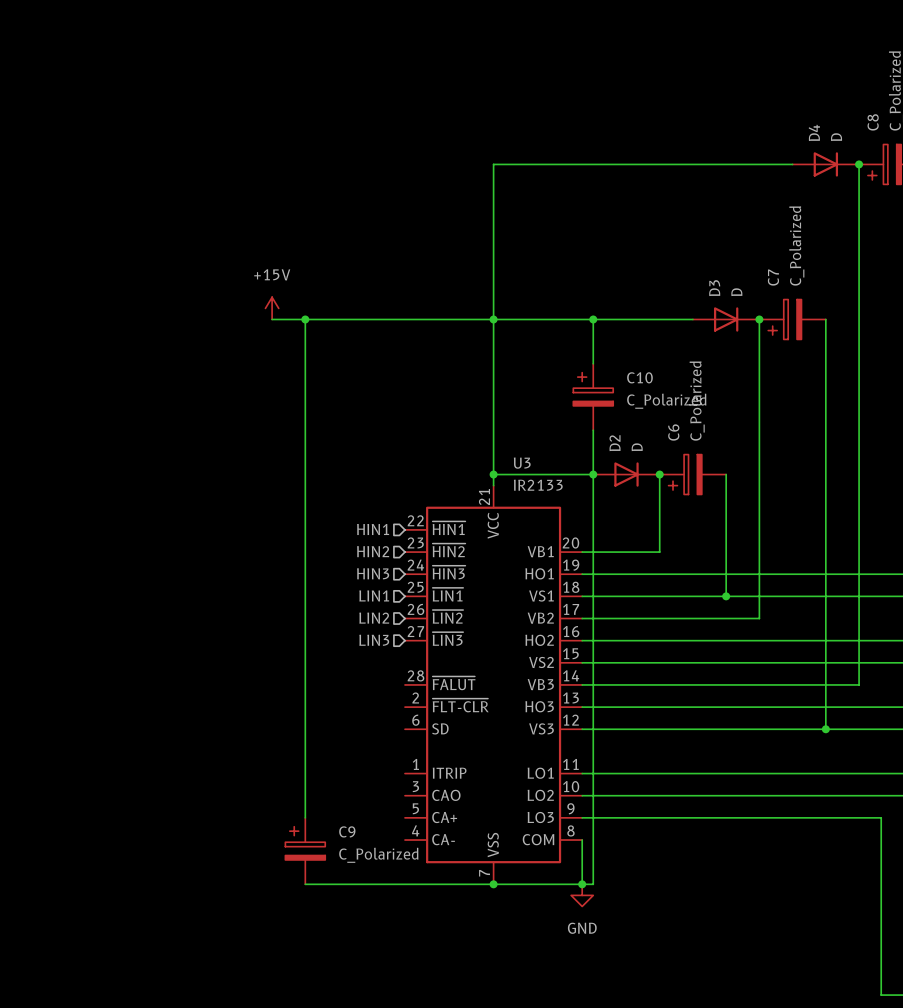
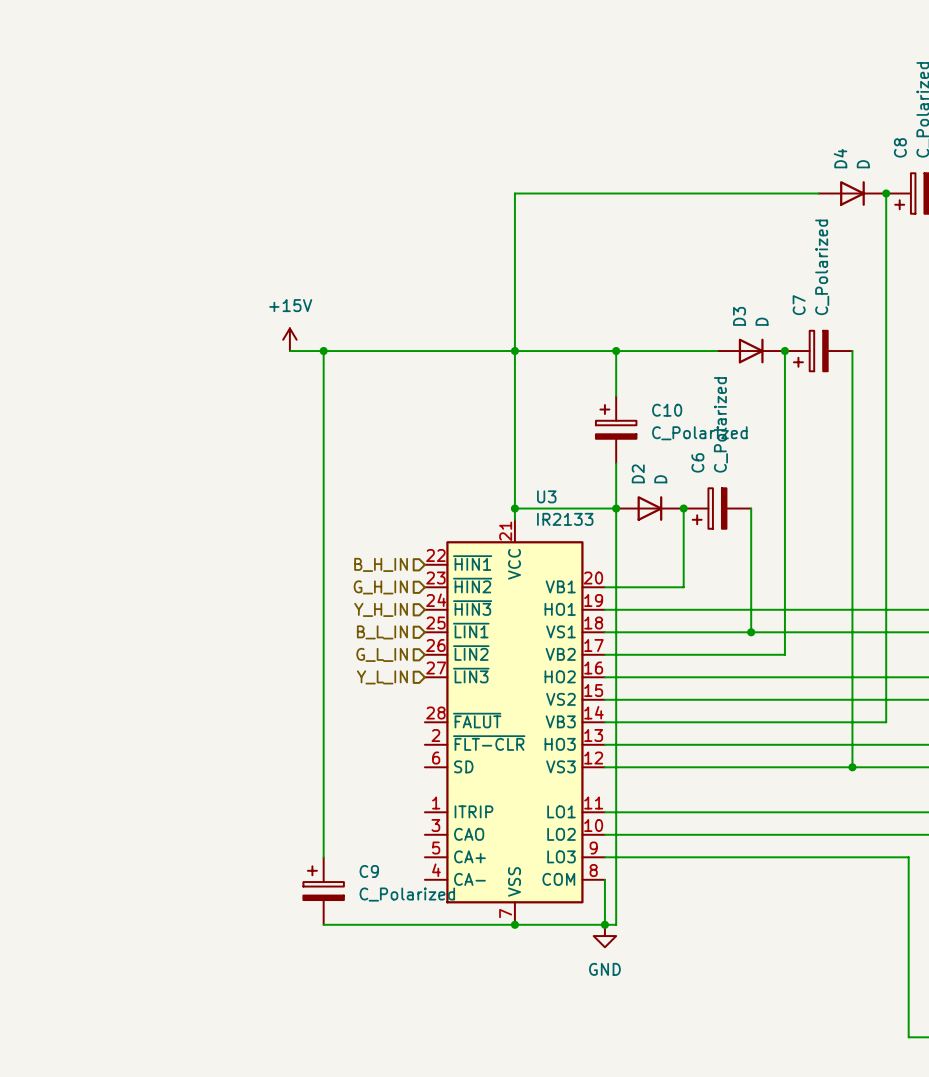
hierarchical label: HIN1 (373, 529) -> B_H_IN (381, 564)
hierarchical label: HIN2 (373, 551) -> G_H_IN (380, 587)
hierarchical label: HIN3 (373, 573) -> Y_H_IN (381, 609)
hierarchical label: LIN1 (374, 595) -> B_L_IN (382, 632)
hierarchical label: LIN2 (374, 618) -> G_L_IN (382, 654)
hierarchical label: LIN3 (374, 640) -> Y_L_IN (382, 677)

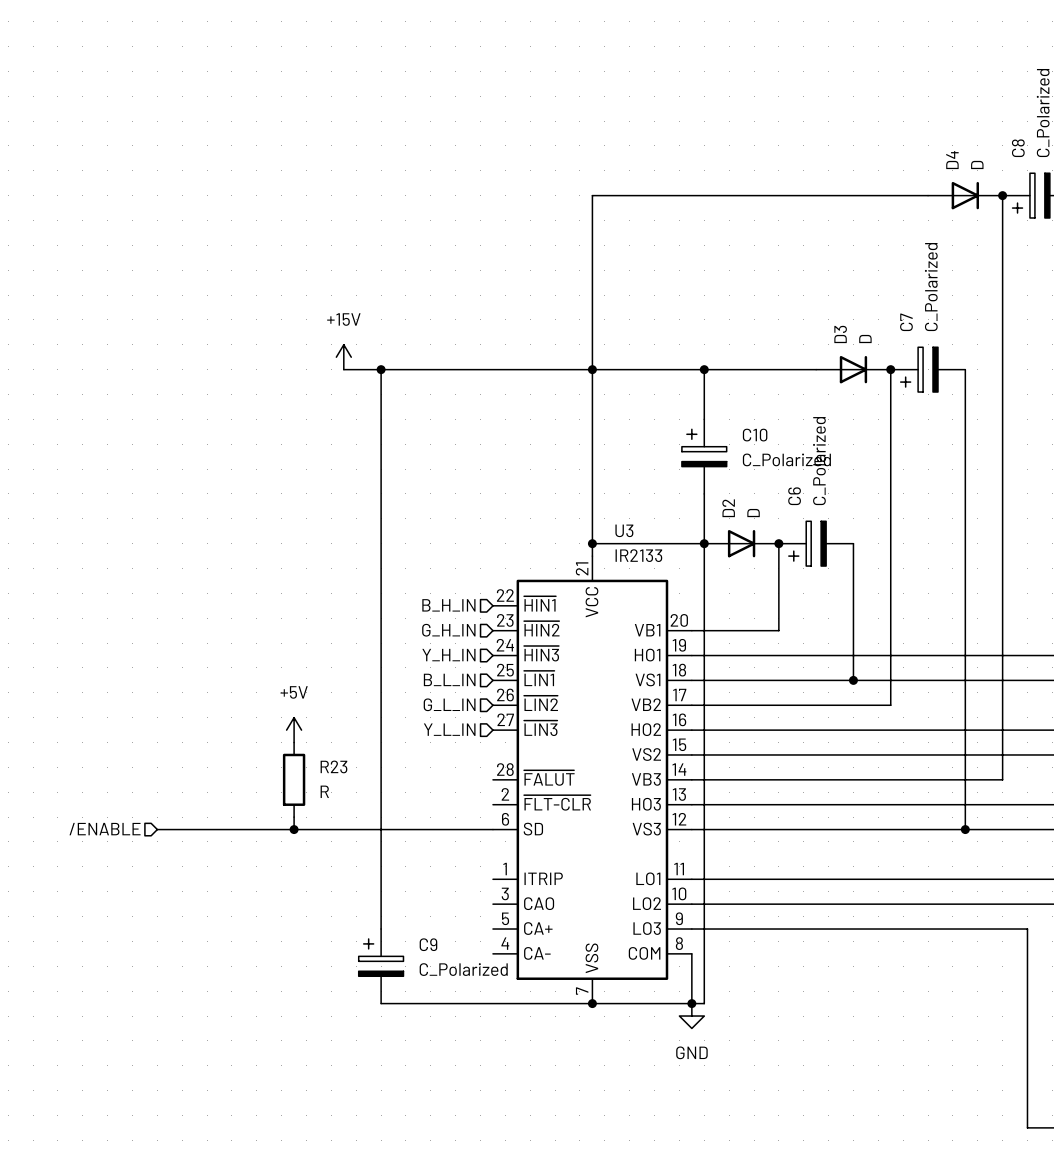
power symbol: none -> +5V (294, 730)
R23: none -> R (294, 779)
wire: none -> (294, 817) (294, 829)
hierarchical label: none -> /ENABLE (105, 829)
wire: none -> (157, 829) (492, 829)
junction: none -> (294, 829)

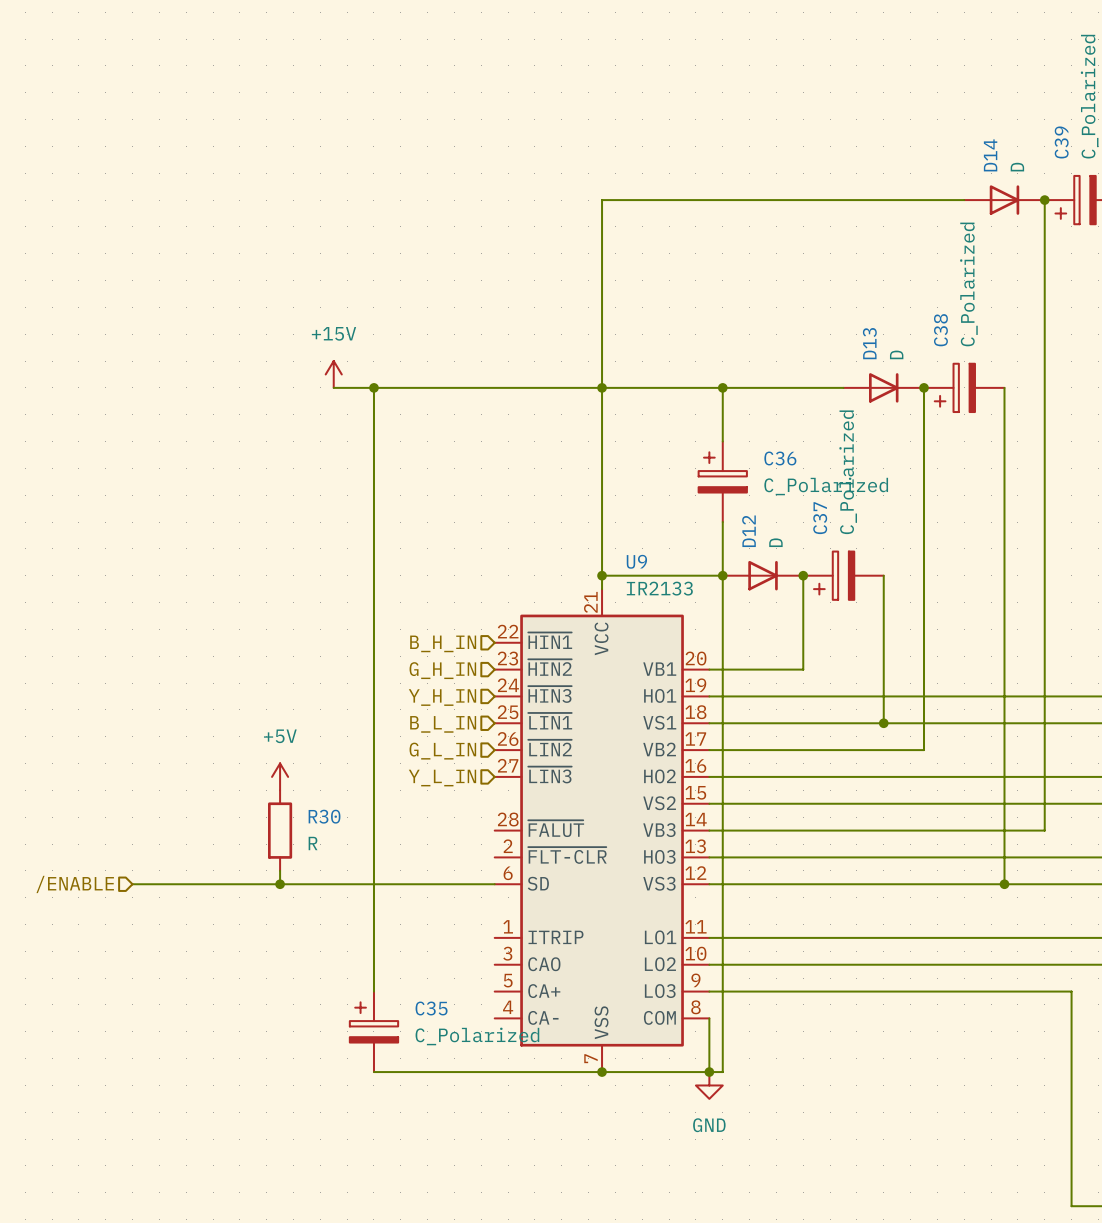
C8 name: C8 (1018, 148) -> C39 (1061, 142)
D4 name: D4 (952, 160) -> D14 (990, 155)
C7 name: C7 (906, 322) -> C38 (940, 330)
D3 name: D3 (840, 334) -> D13 (869, 343)
C10 name: C10 (755, 435) -> C36 (780, 458)
C6 name: C6 (794, 496) -> C37 (820, 518)
D2 name: D2 (728, 508) -> D12 (748, 531)
U3 name: U3 (624, 530) -> U9 (636, 561)
R23 name: R23 (333, 766) -> R30 (324, 816)
C9 name: C9 (428, 944) -> C35 (431, 1008)

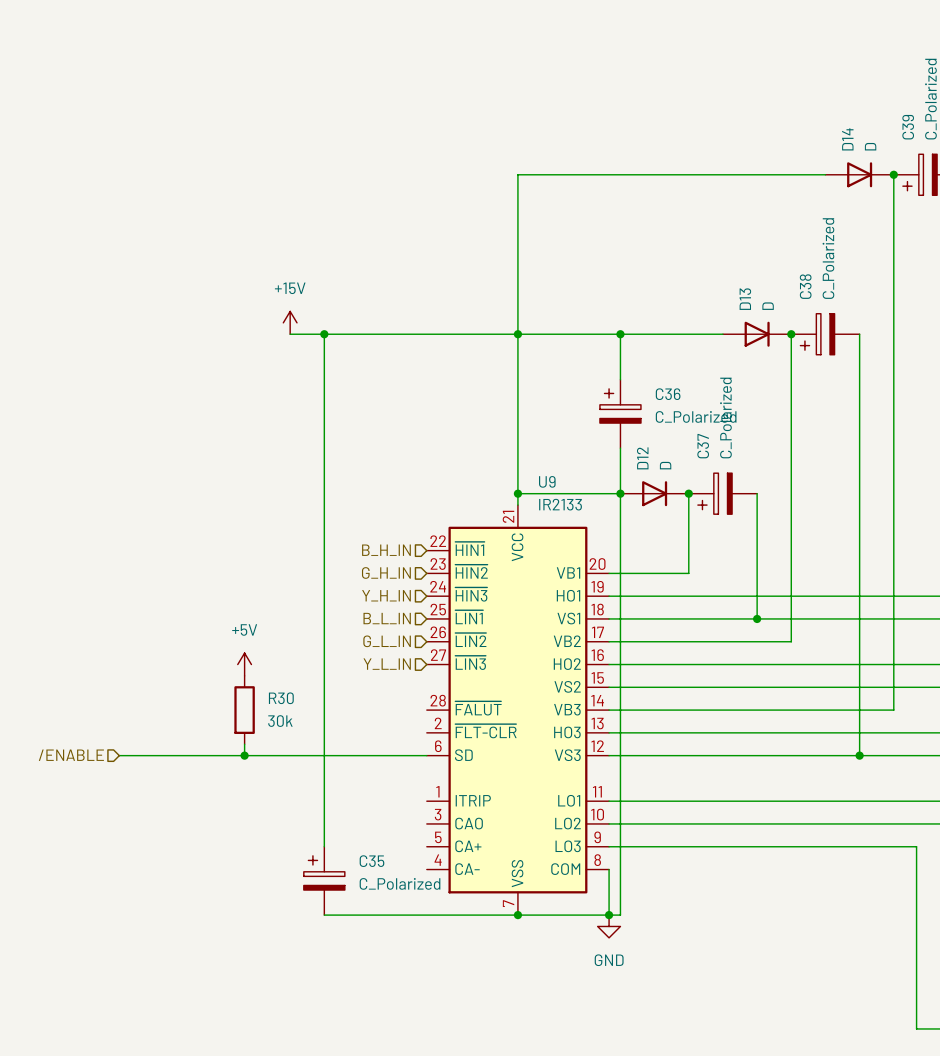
R30 value: R (313, 843) -> 30k (280, 721)

